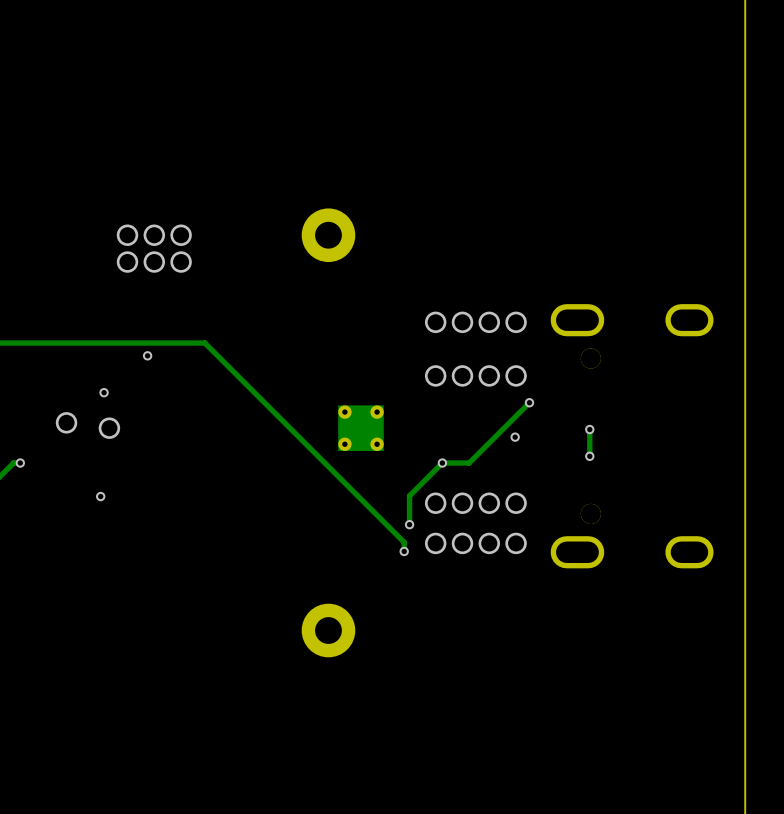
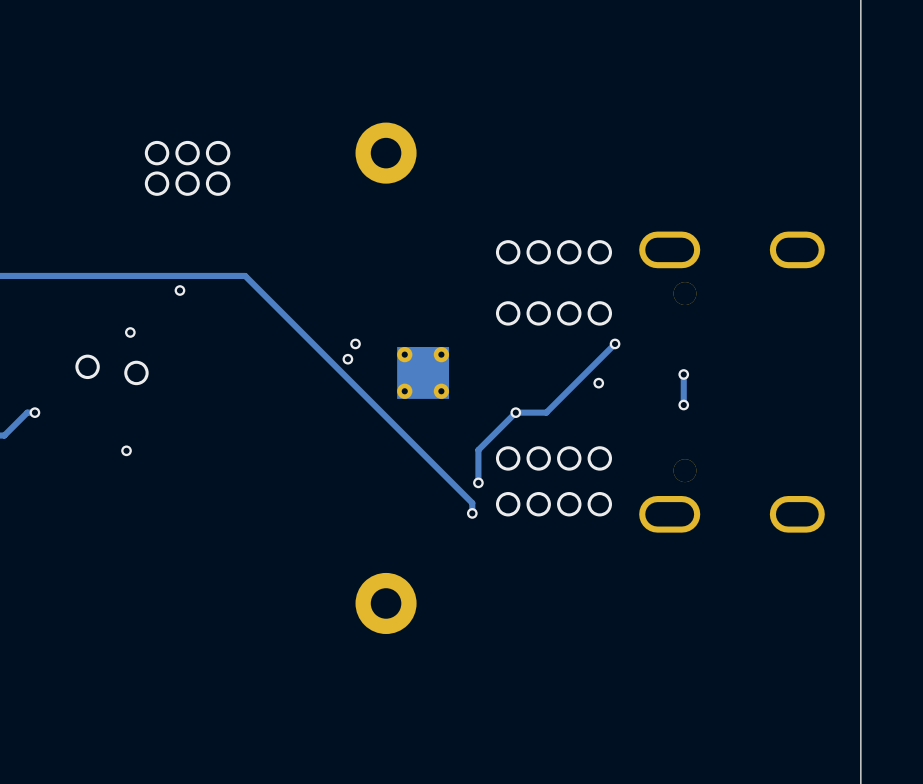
via: none -> (355, 343)
via: none -> (347, 359)

